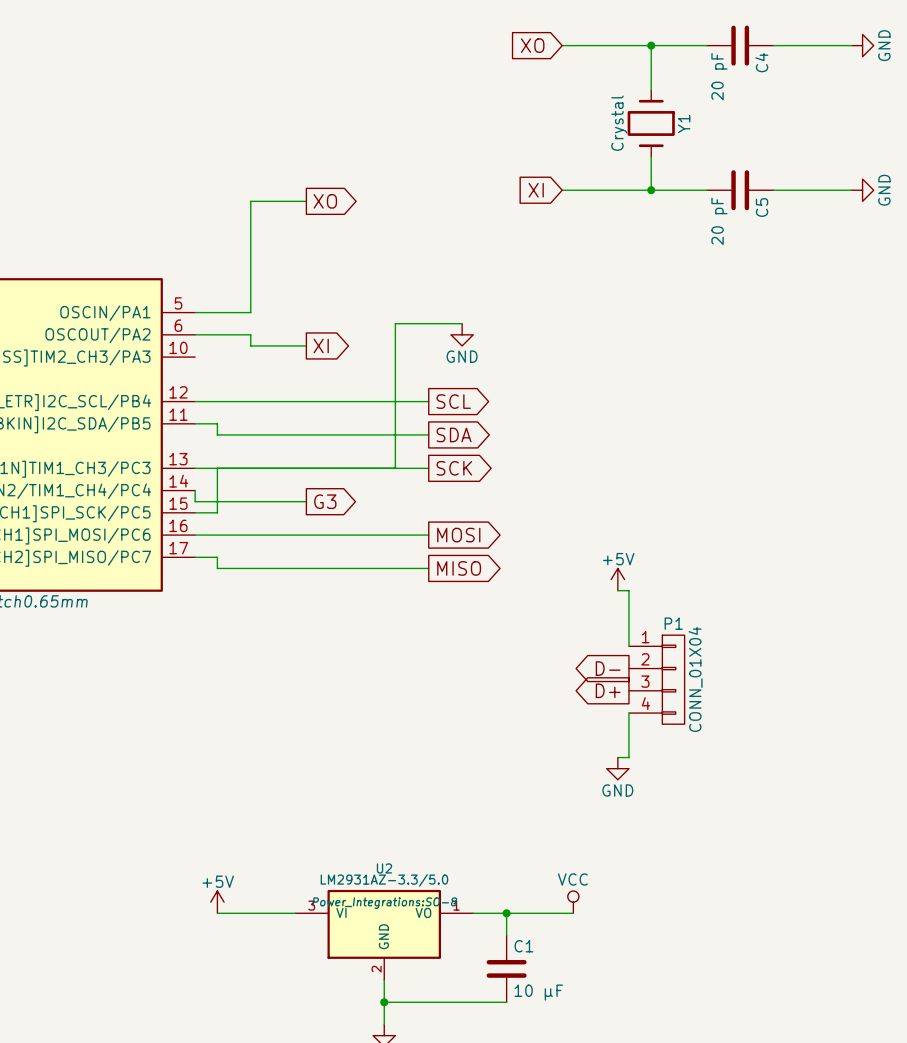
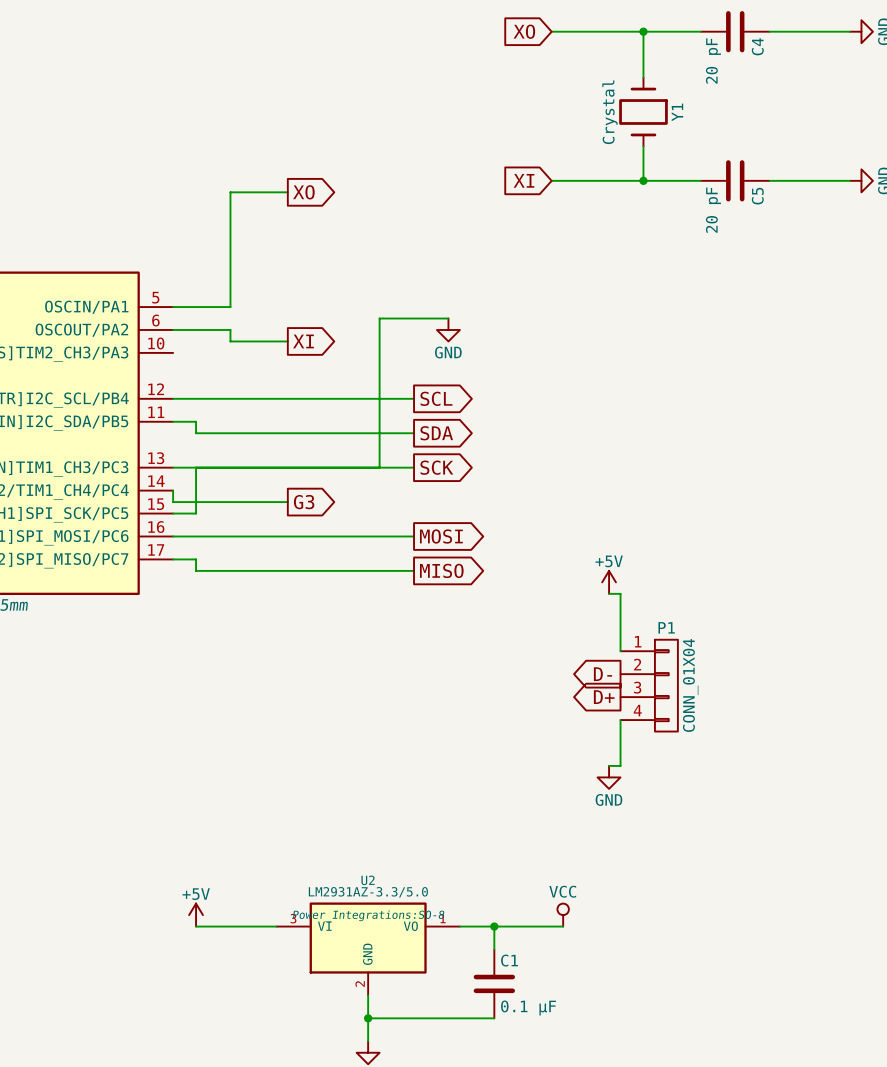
C1 value: 10 µF (538, 992) -> 0.1 µF (528, 1007)

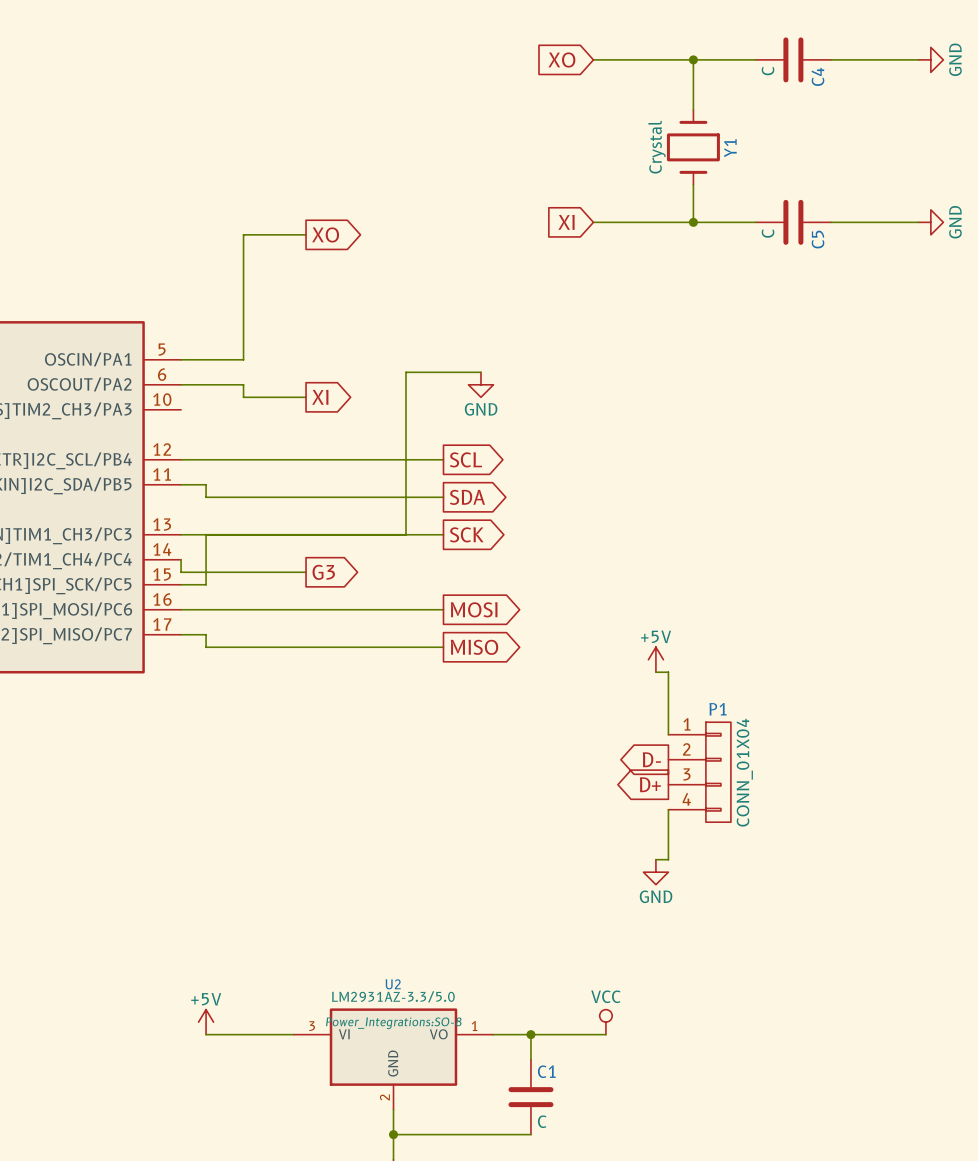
C4 value: 20 pF (713, 61) -> C (768, 71)
C5 value: 20 pF (713, 210) -> C (768, 233)
C1 value: 0.1 µF (528, 1007) -> C (542, 1121)

